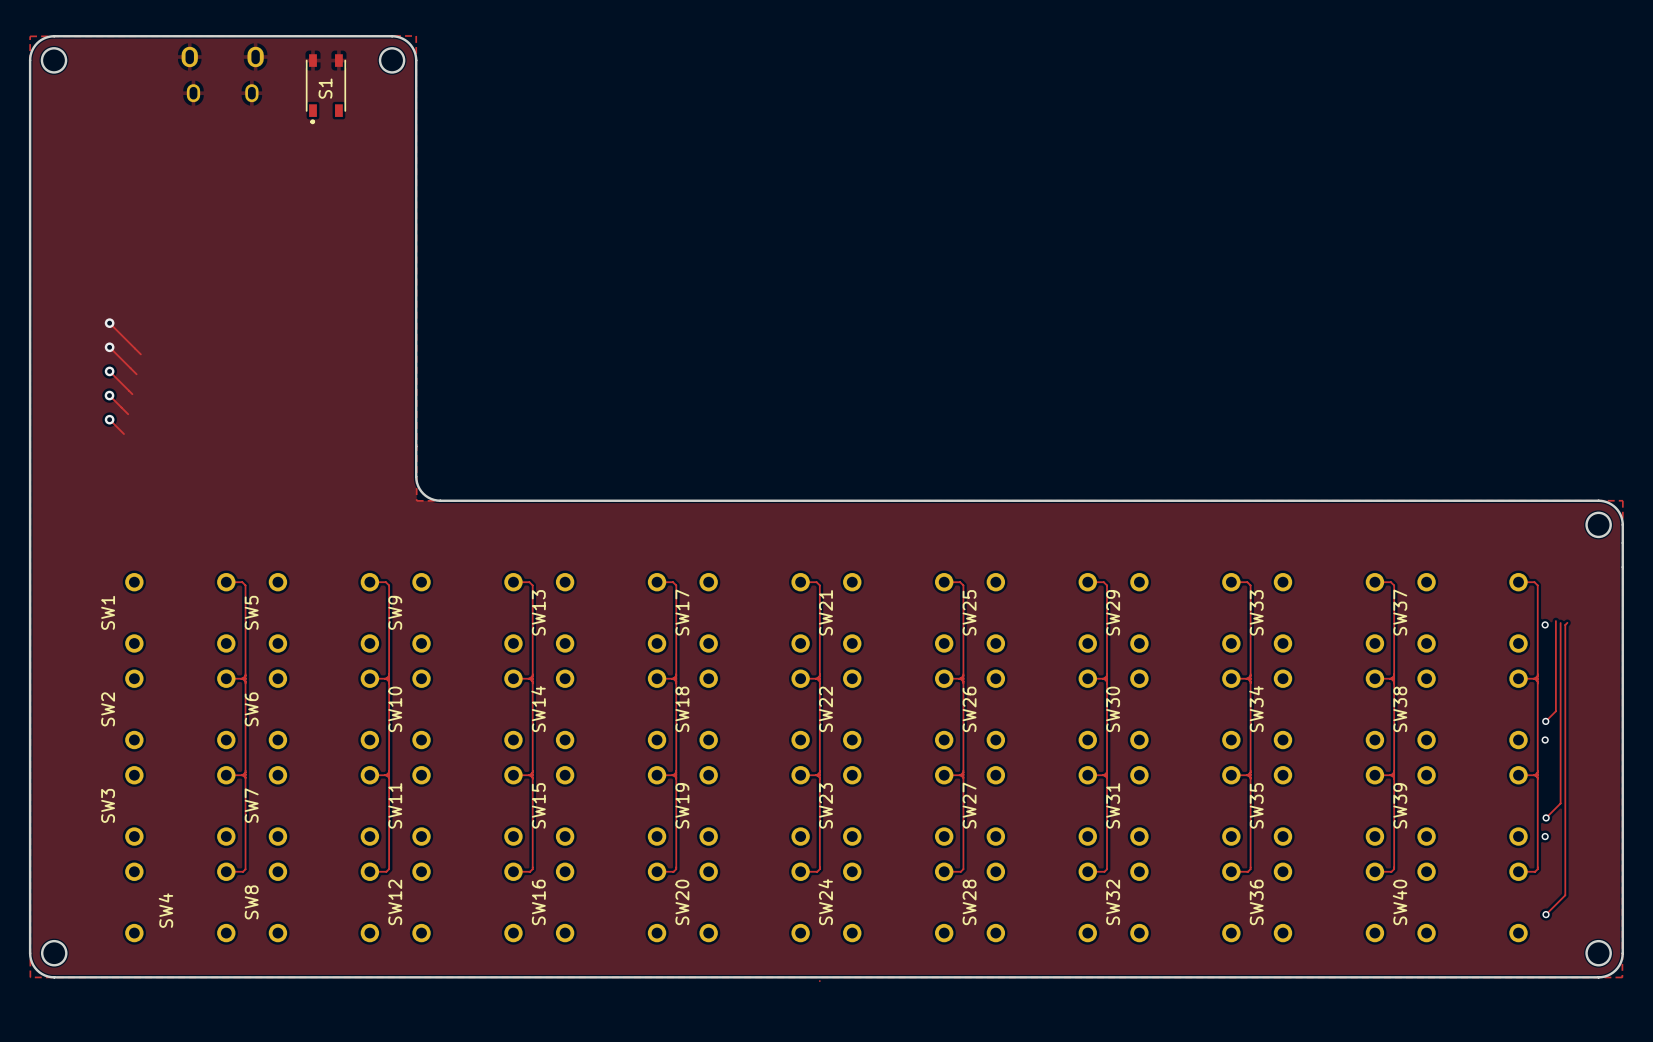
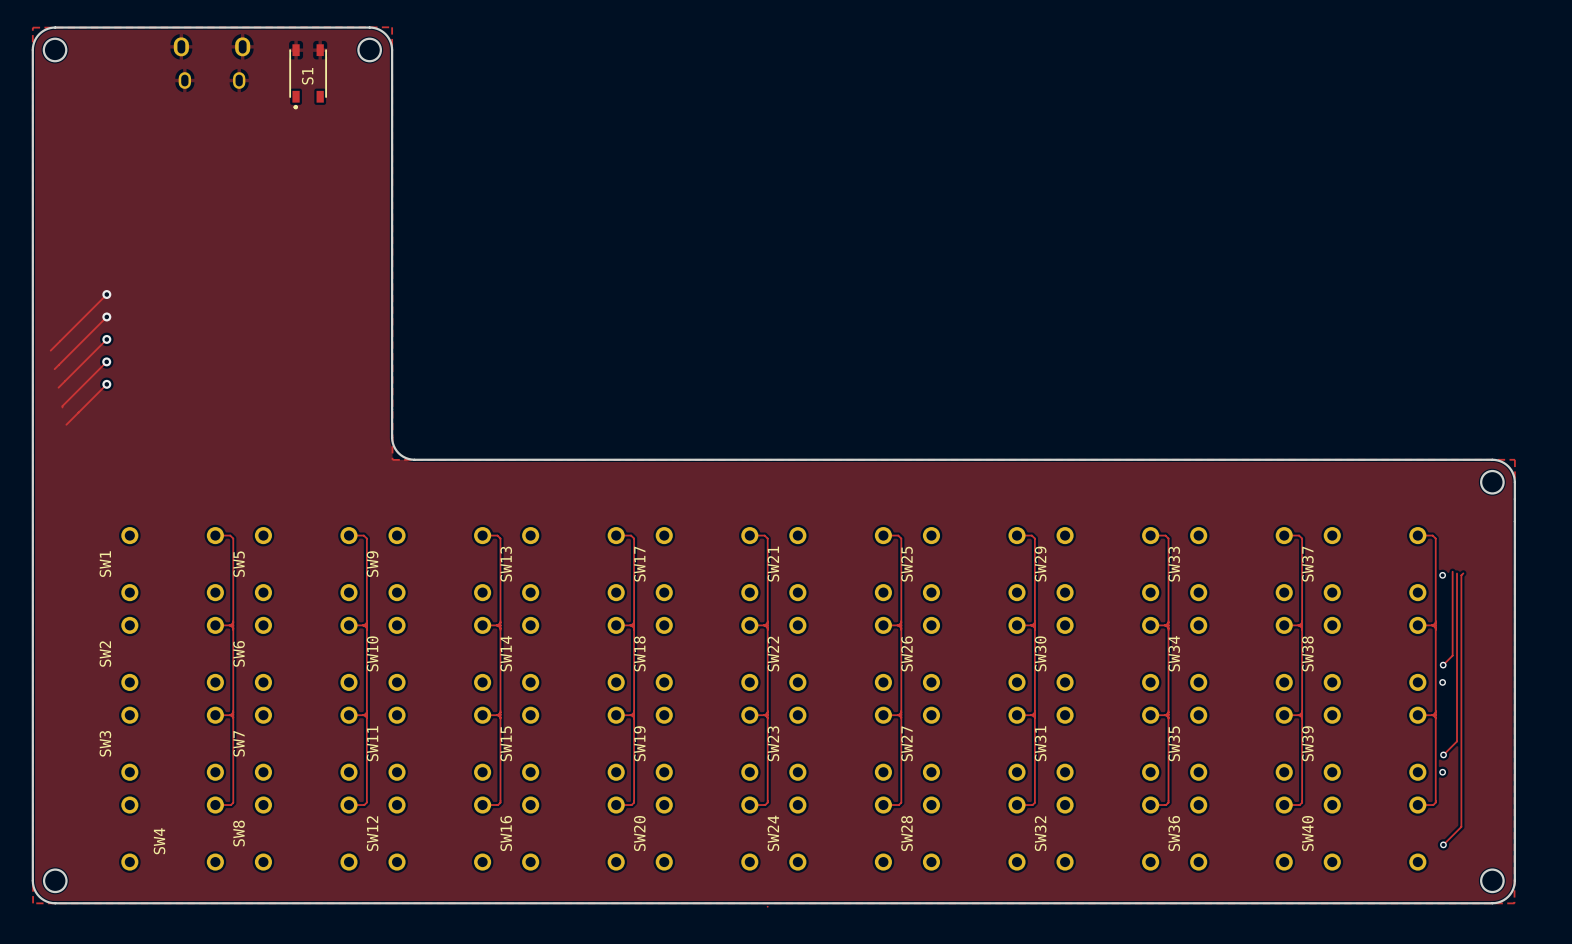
track: (109, 323) (140, 354) -> (106, 294) (50, 350)
track: (109, 347) (136, 374) -> (106, 316) (54, 369)
track: (109, 371) (132, 394) -> (106, 339) (58, 387)
track: (109, 395) (128, 414) -> (106, 361) (62, 407)
track: (109, 419) (123, 434) -> (106, 384) (66, 424)

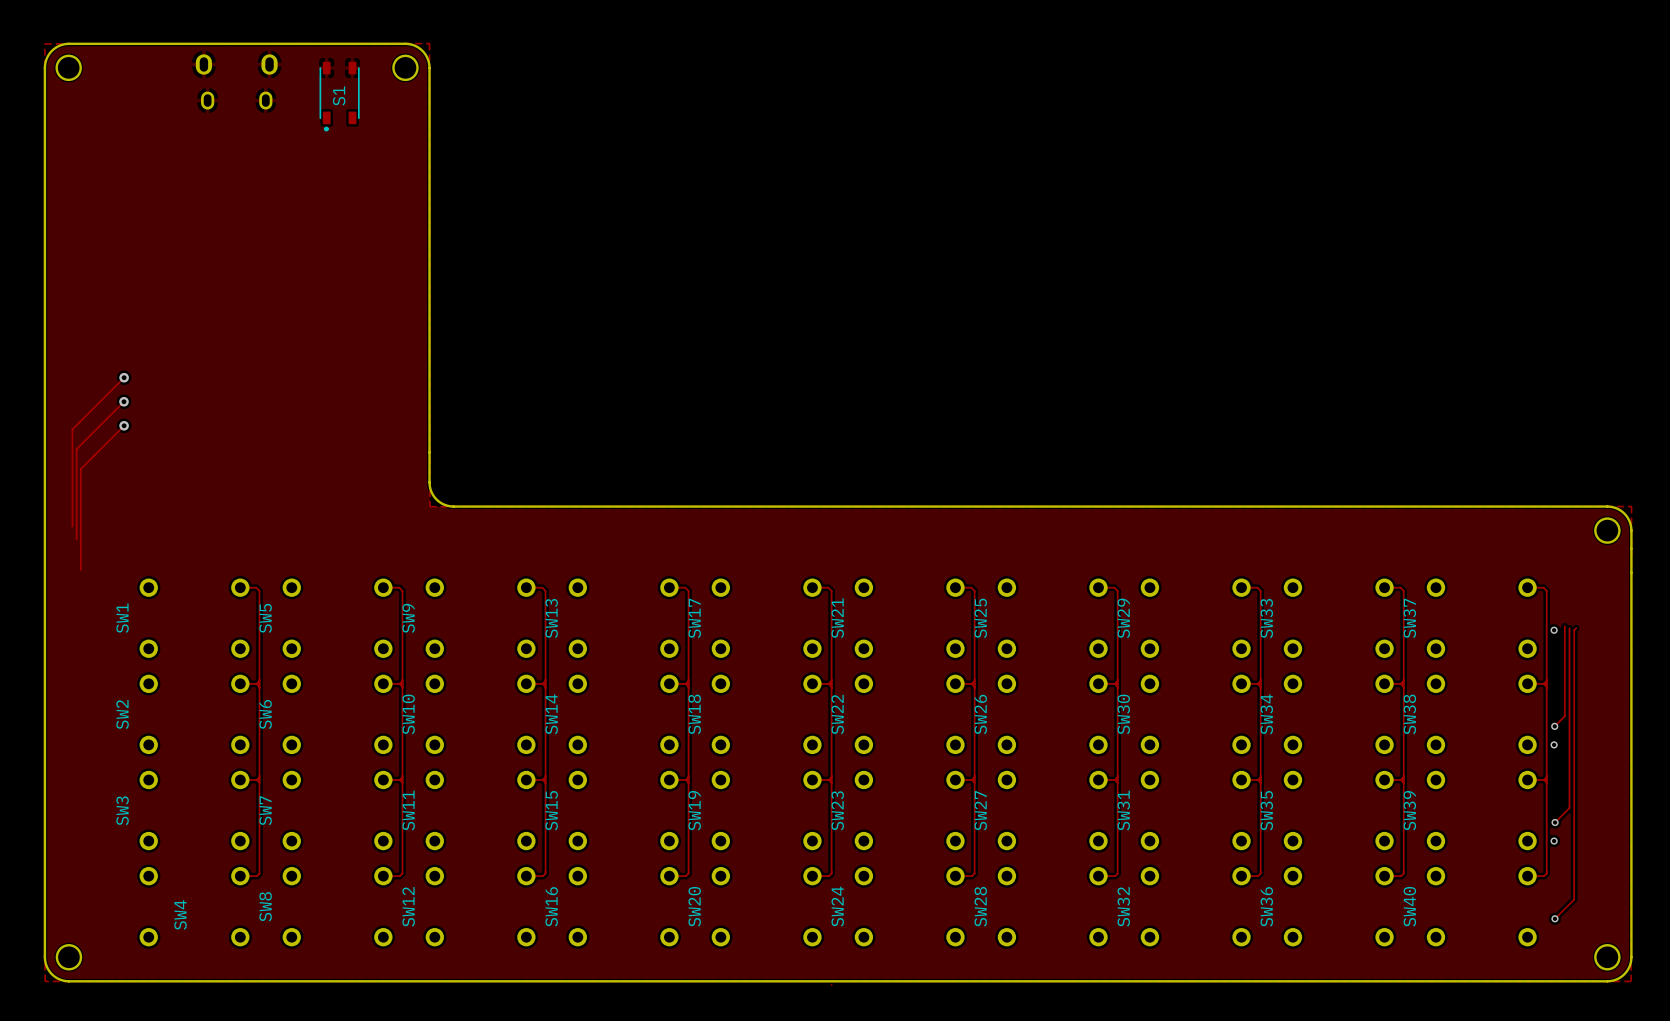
track: (106, 294) (50, 350) -> none
via: (106, 294) -> none
track: (106, 316) (54, 369) -> none
via: (106, 316) -> none
track: none -> (72, 429) (72, 526)
track: none -> (76, 450) (76, 539)
track: none -> (80, 469) (80, 570)

